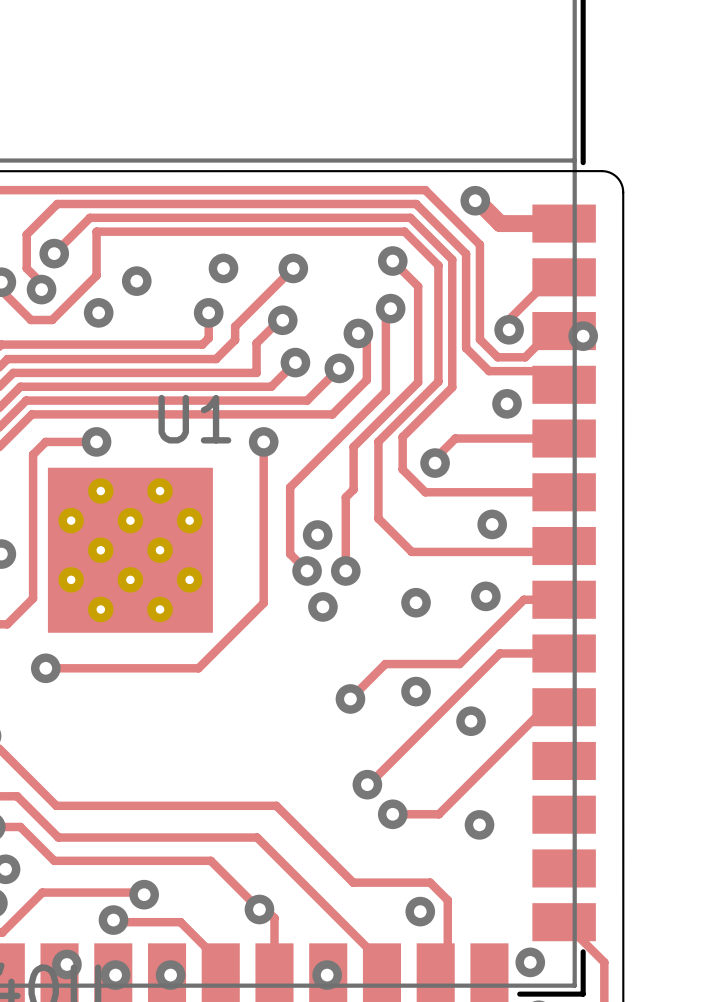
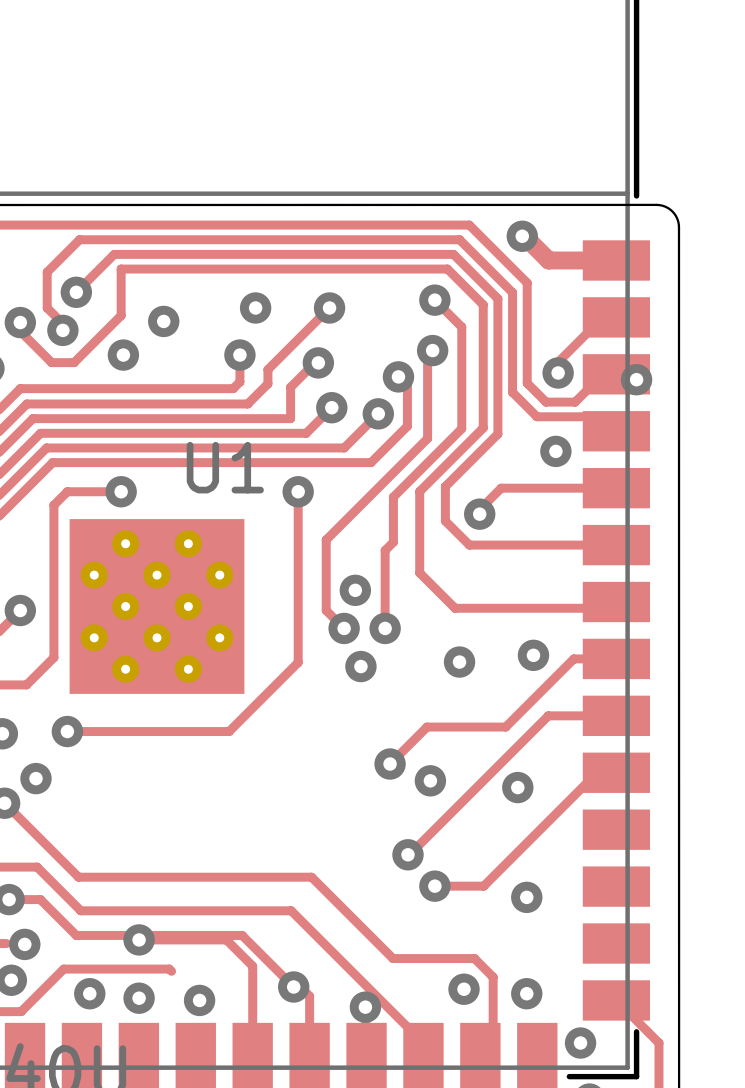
via: (492, 524) -> none
via position: (416, 691) -> (430, 780)
via: none -> (36, 778)
track: none -> (139, 939) (226, 939) (252, 966) (252, 1056)
via: none -> (139, 939)
via position: (144, 894) -> (199, 1000)
via: none -> (89, 993)
via: none -> (526, 993)
track: (113, 920) (115, 922) (180, 922) (220, 962) -> none
via: (66, 964) -> none
via: (115, 975) -> none
via: (170, 975) -> none
via position: (327, 975) -> (365, 1007)

